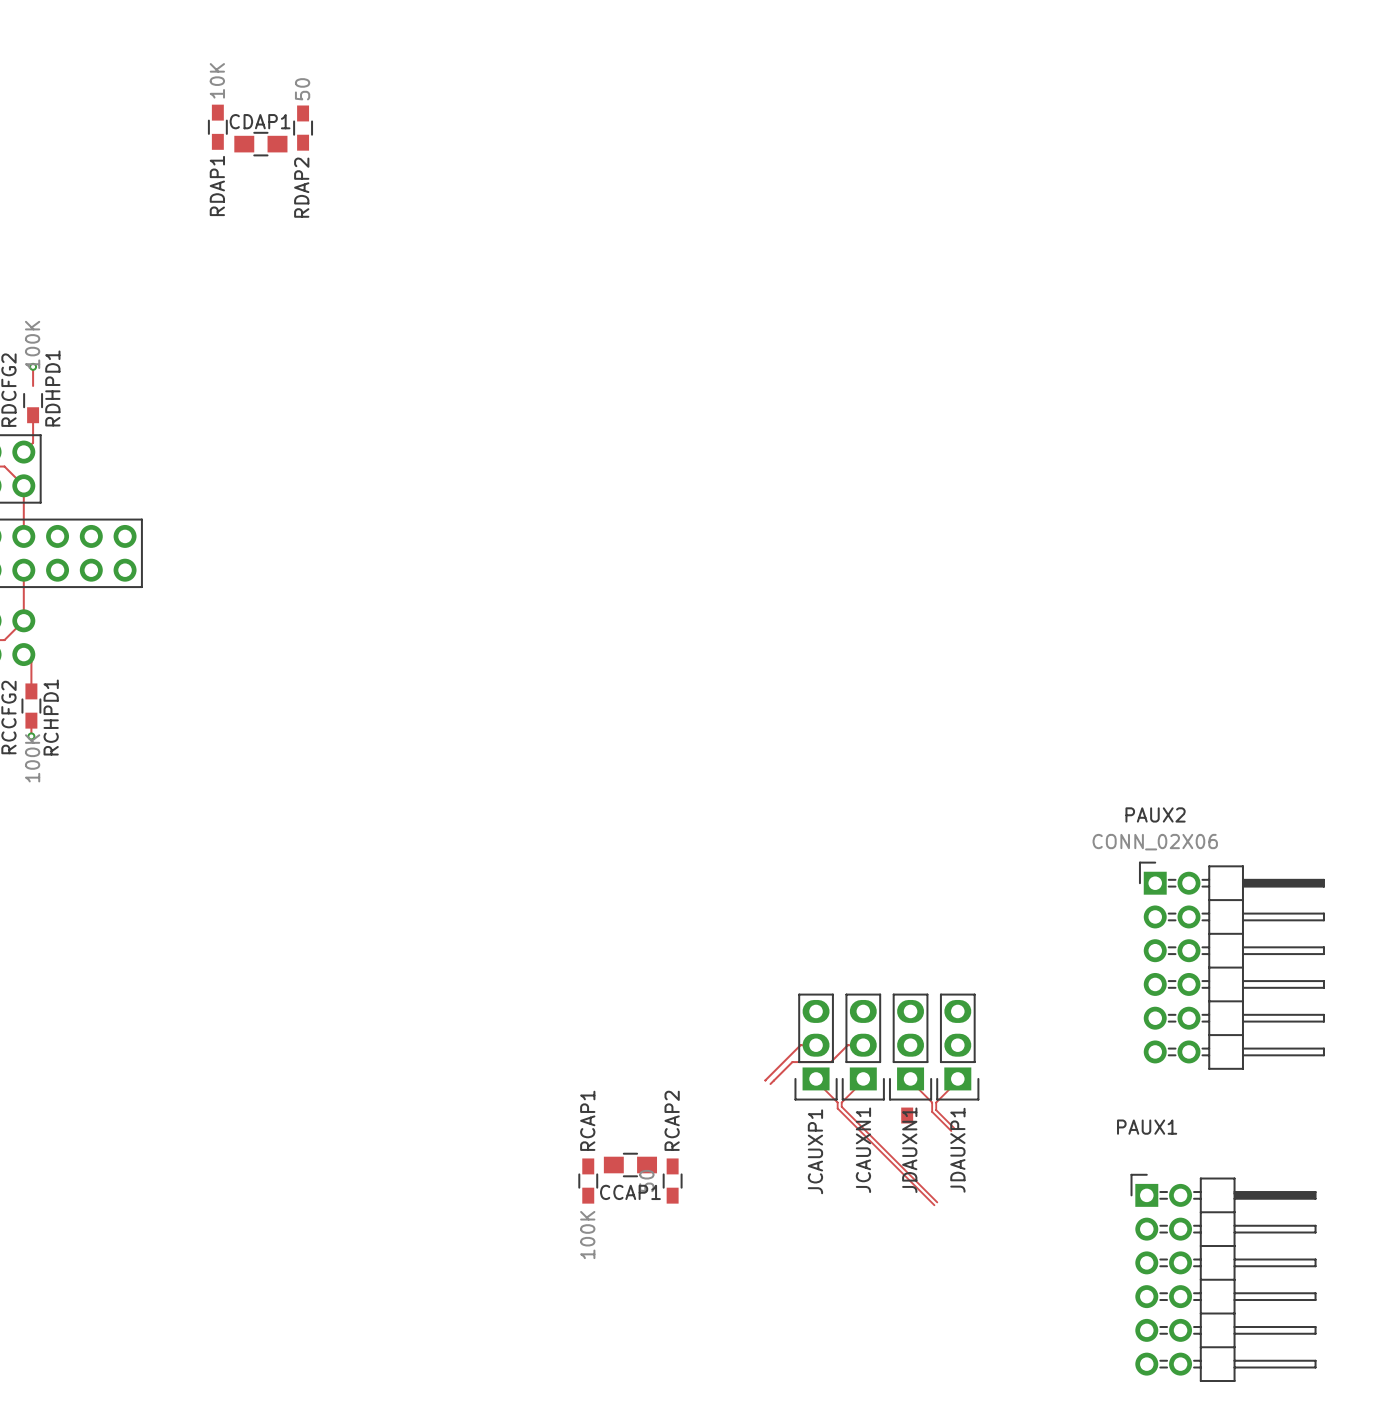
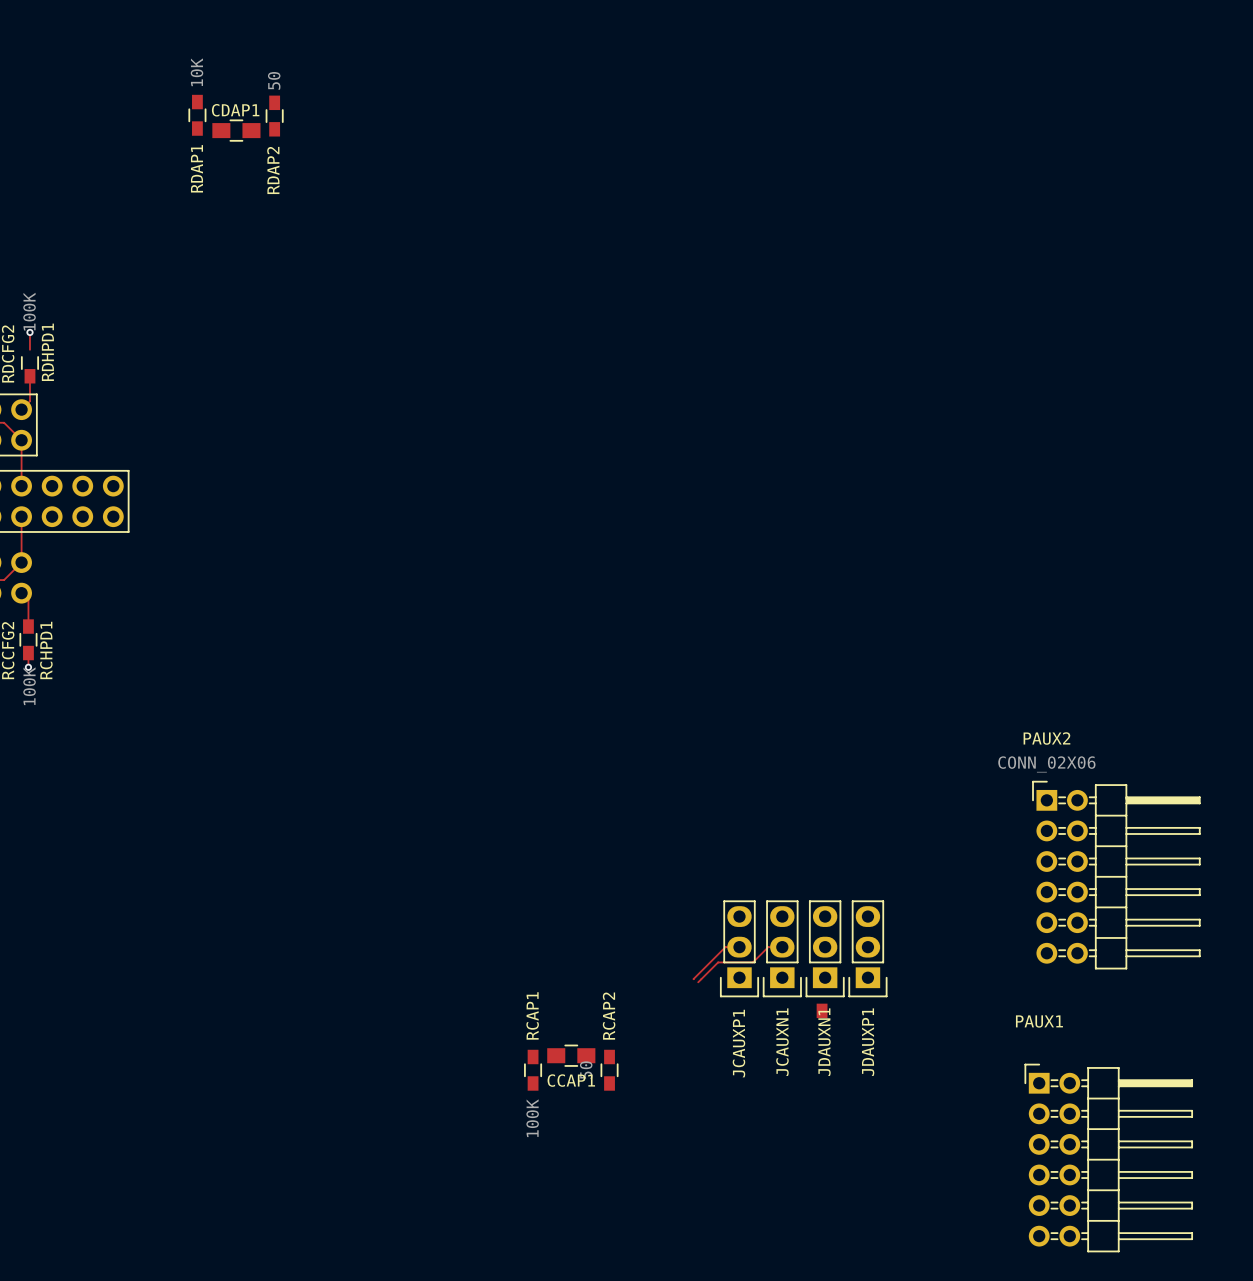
track: (816, 1078) (837, 1102) (837, 1108) (934, 1205) -> none
track: (863, 1078) (841, 1102) (841, 1106) (937, 1202) -> none
track: (910, 1078) (932, 1102) (932, 1111) (951, 1131) -> none
track: (957, 1078) (936, 1102) (936, 1110) (954, 1128) -> none

